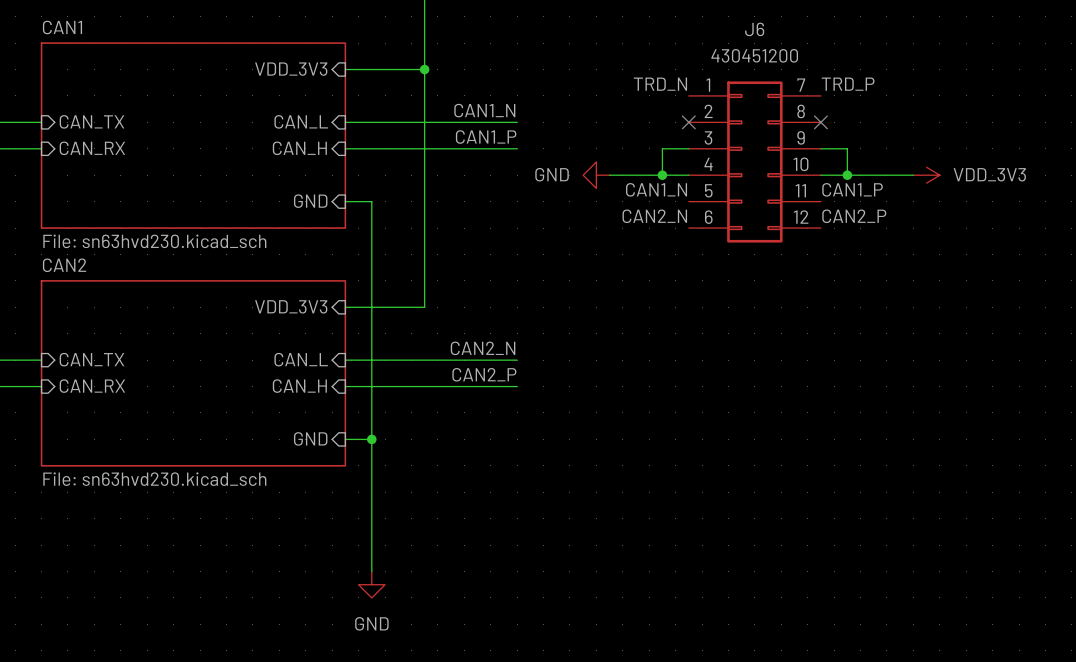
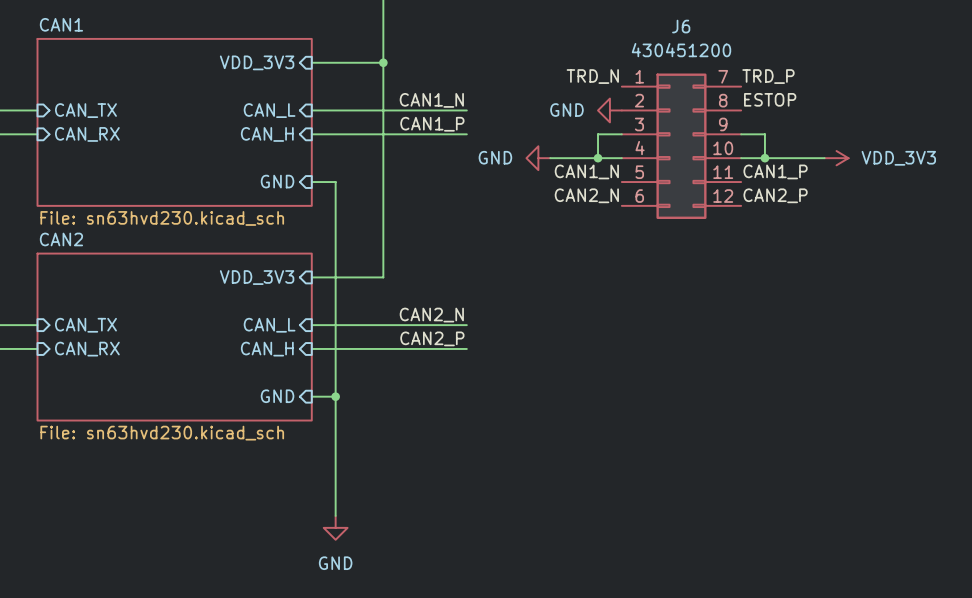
label: none -> ESTOP (770, 99)
power symbol: none -> GND (609, 110)
no-connect mark: (688, 122) -> none
no-connect mark: (820, 122) -> none

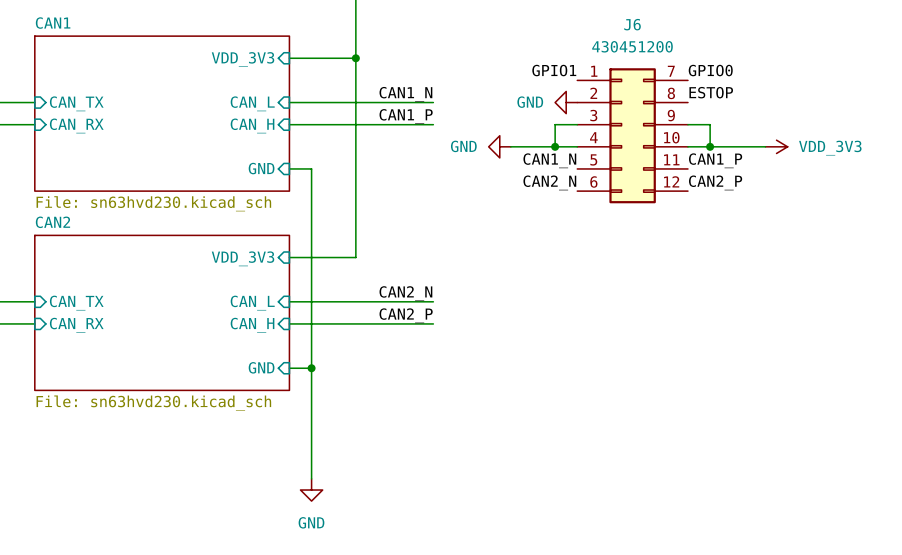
label: TRD_N (592, 76) -> GPIO1 (554, 70)
label: TRD_P (768, 76) -> GPIO0 (710, 70)

